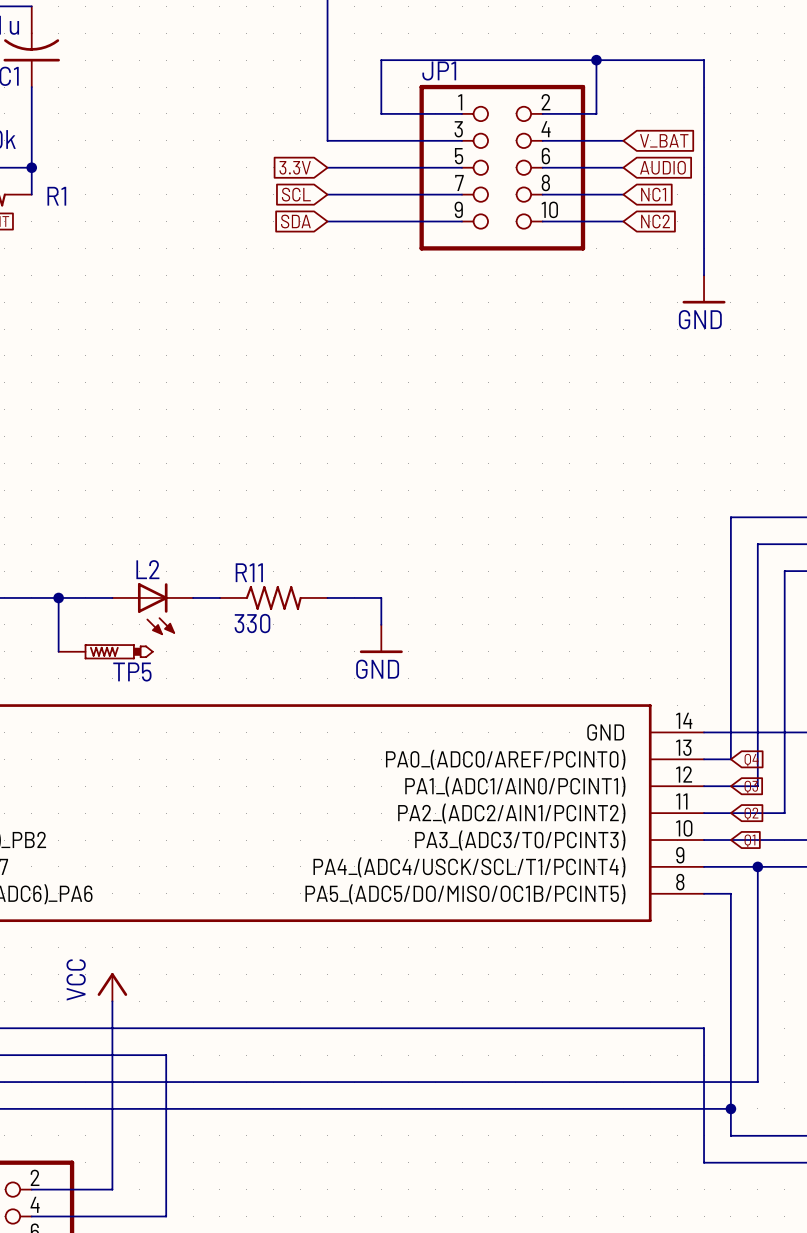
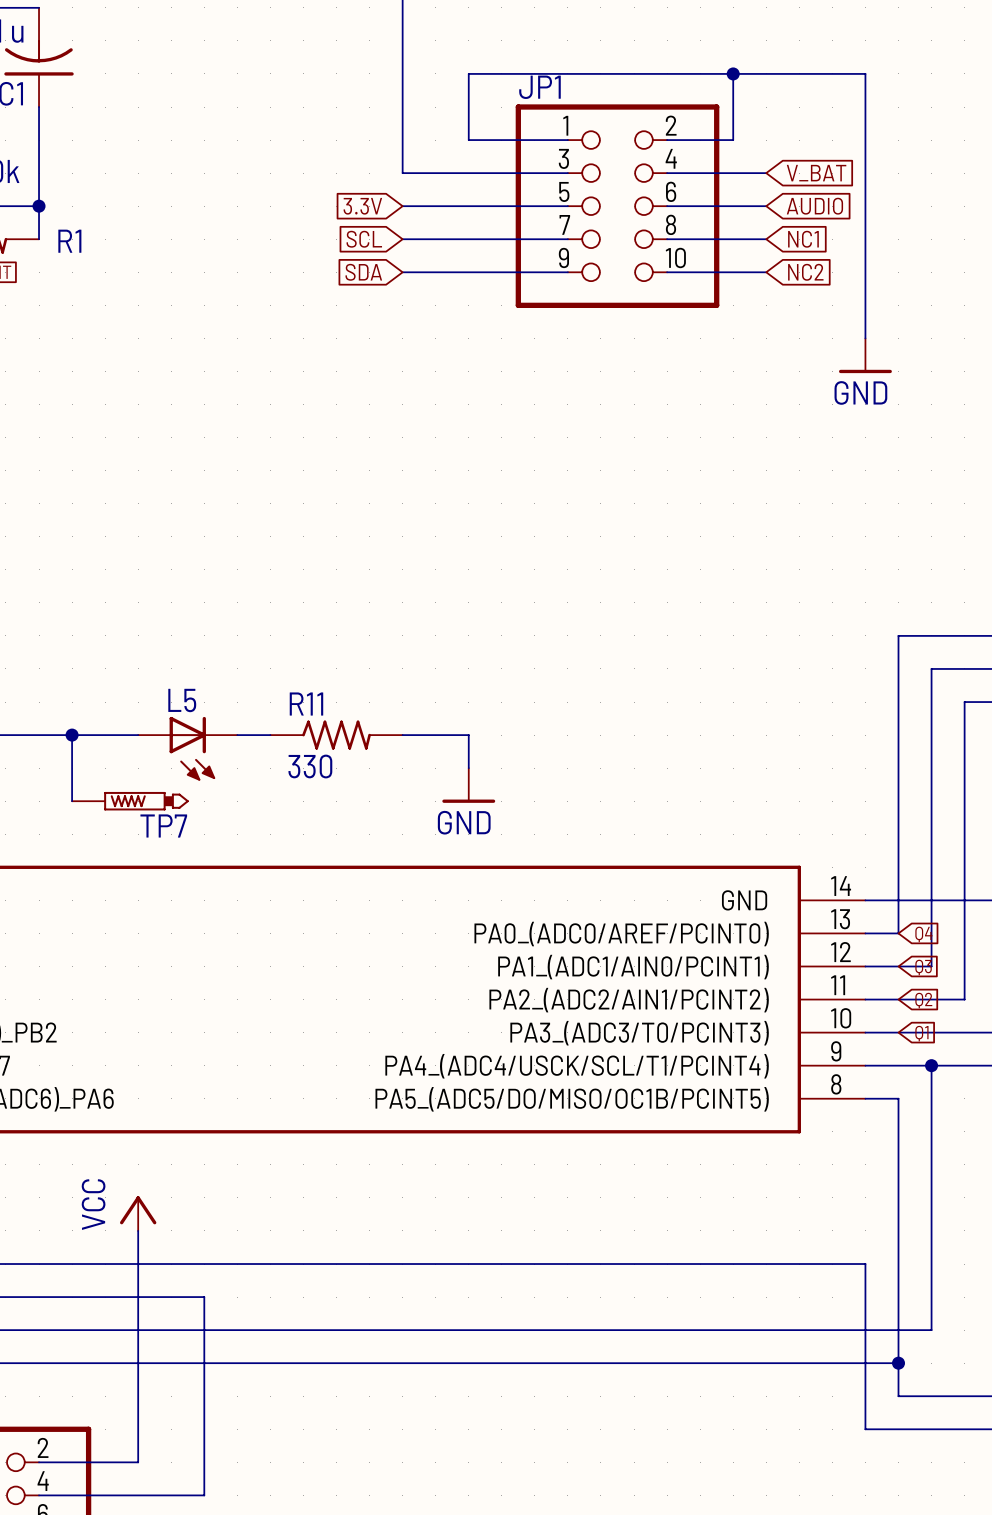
L2 name: L2 (147, 569) -> L5 (182, 700)
TP5 name: TP5 (132, 672) -> TP7 (163, 825)

